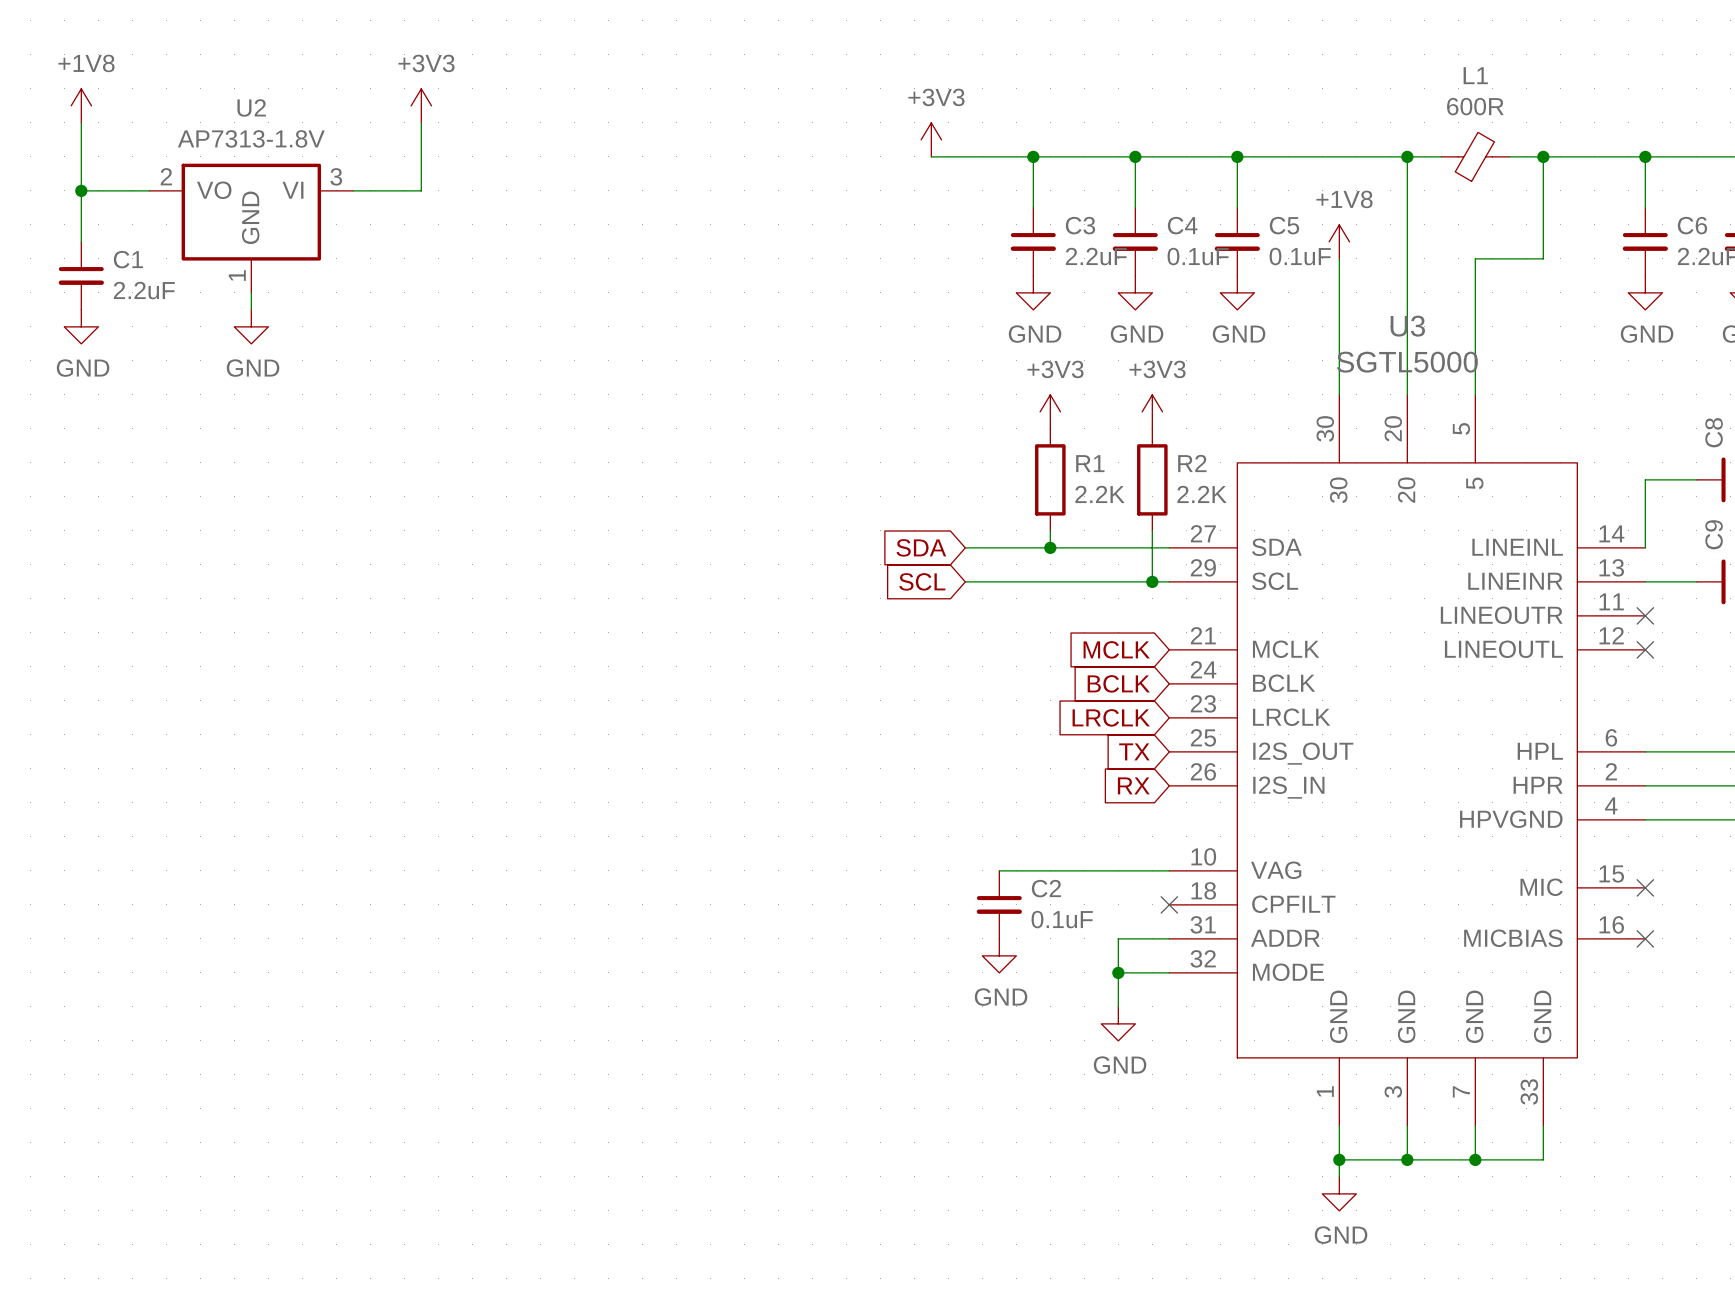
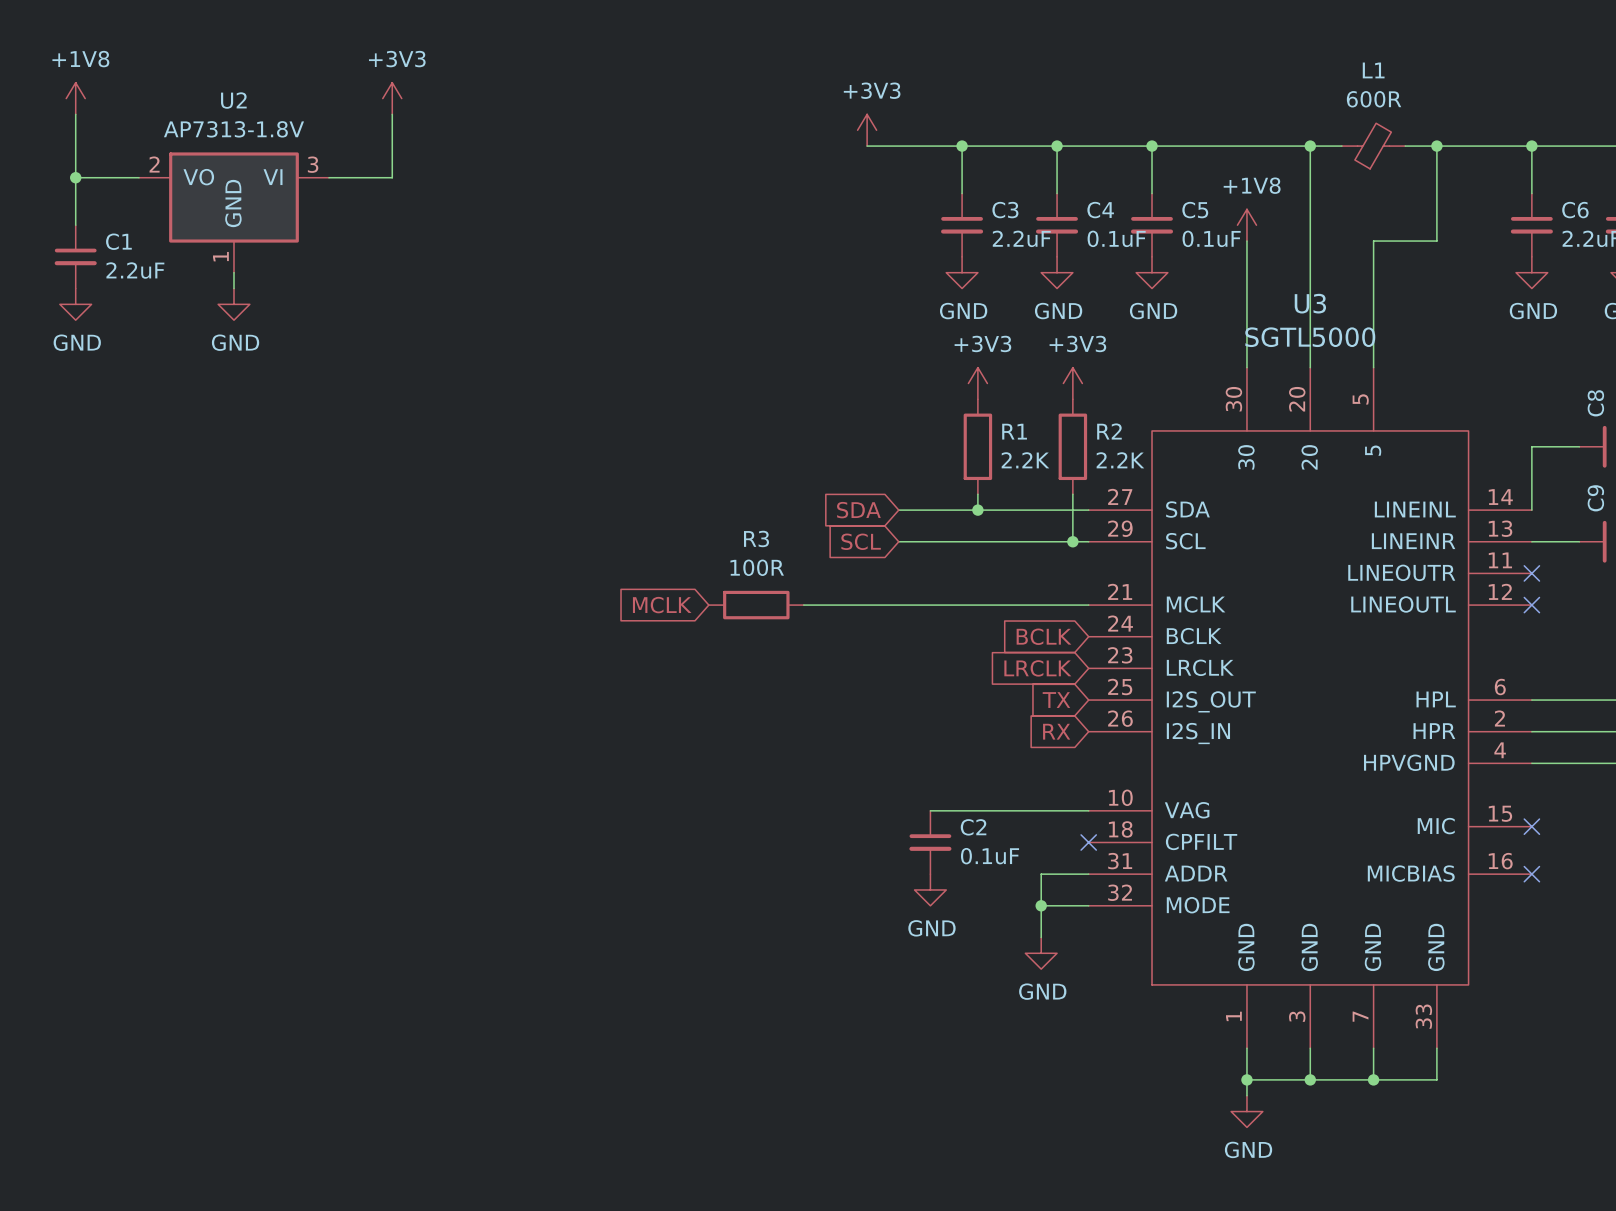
global label: none -> MCLK (662, 605)
R3: none -> 100R (756, 605)
wire: none -> (803, 605) (1088, 605)
global label: MCLK (1116, 649) -> none

